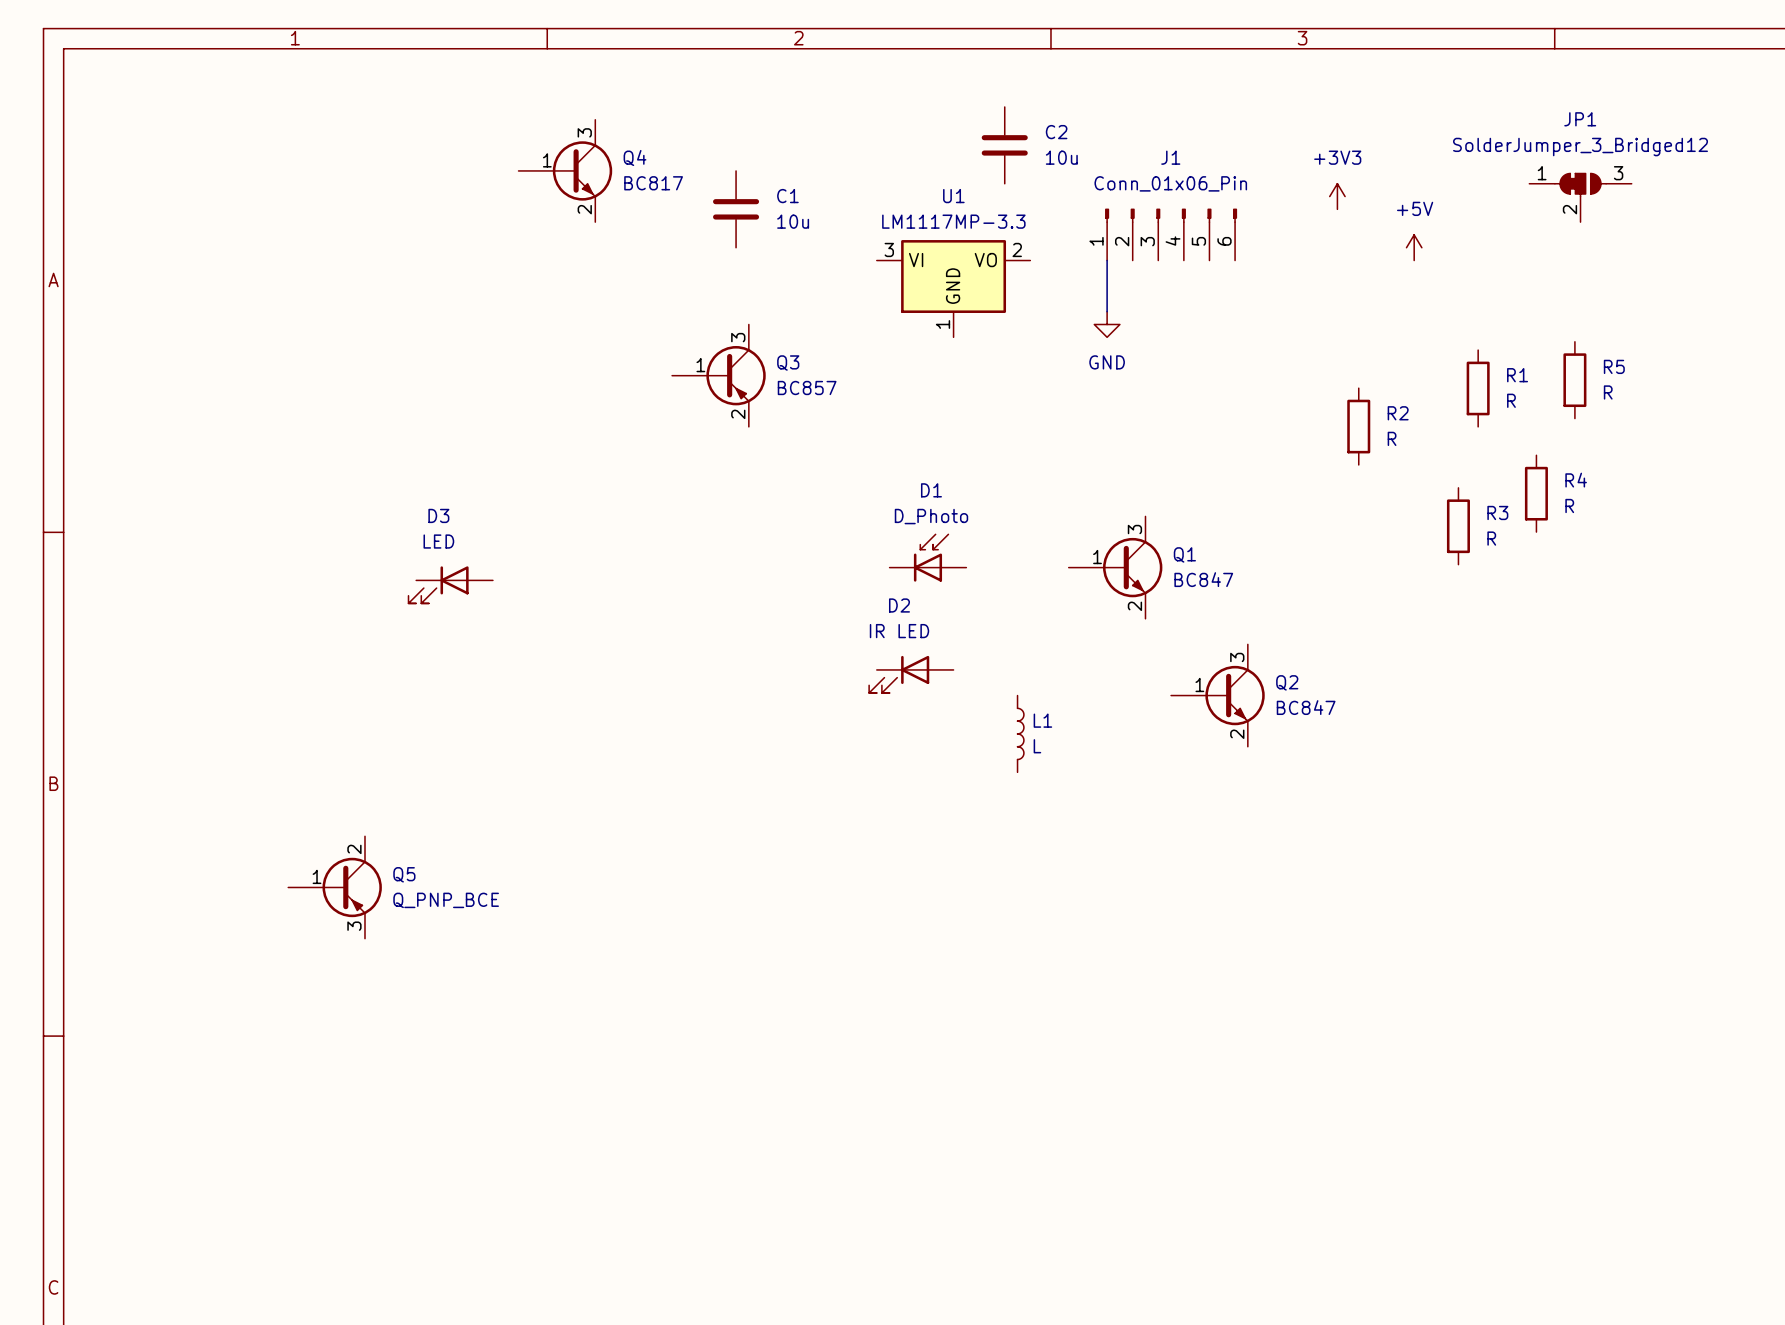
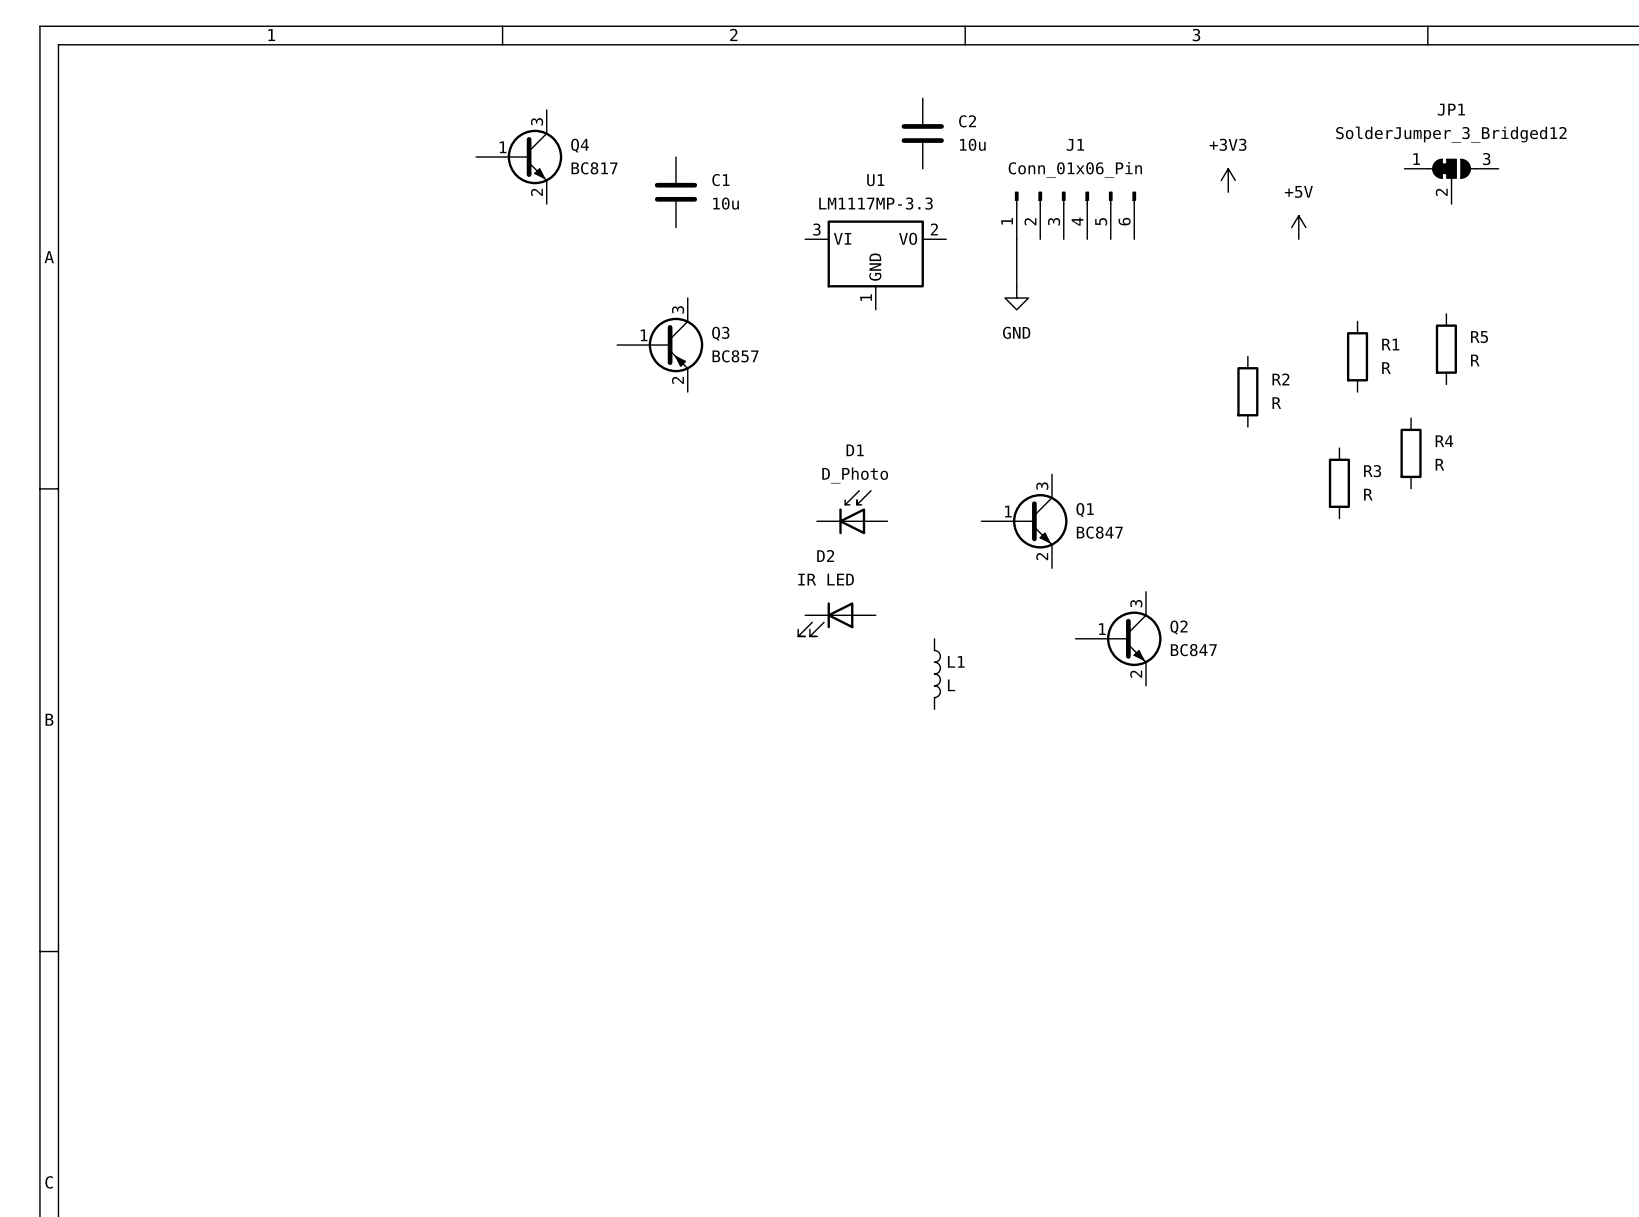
D3: LED (450, 584) -> none
Q5: Q_PNP_BCE (335, 887) -> none

